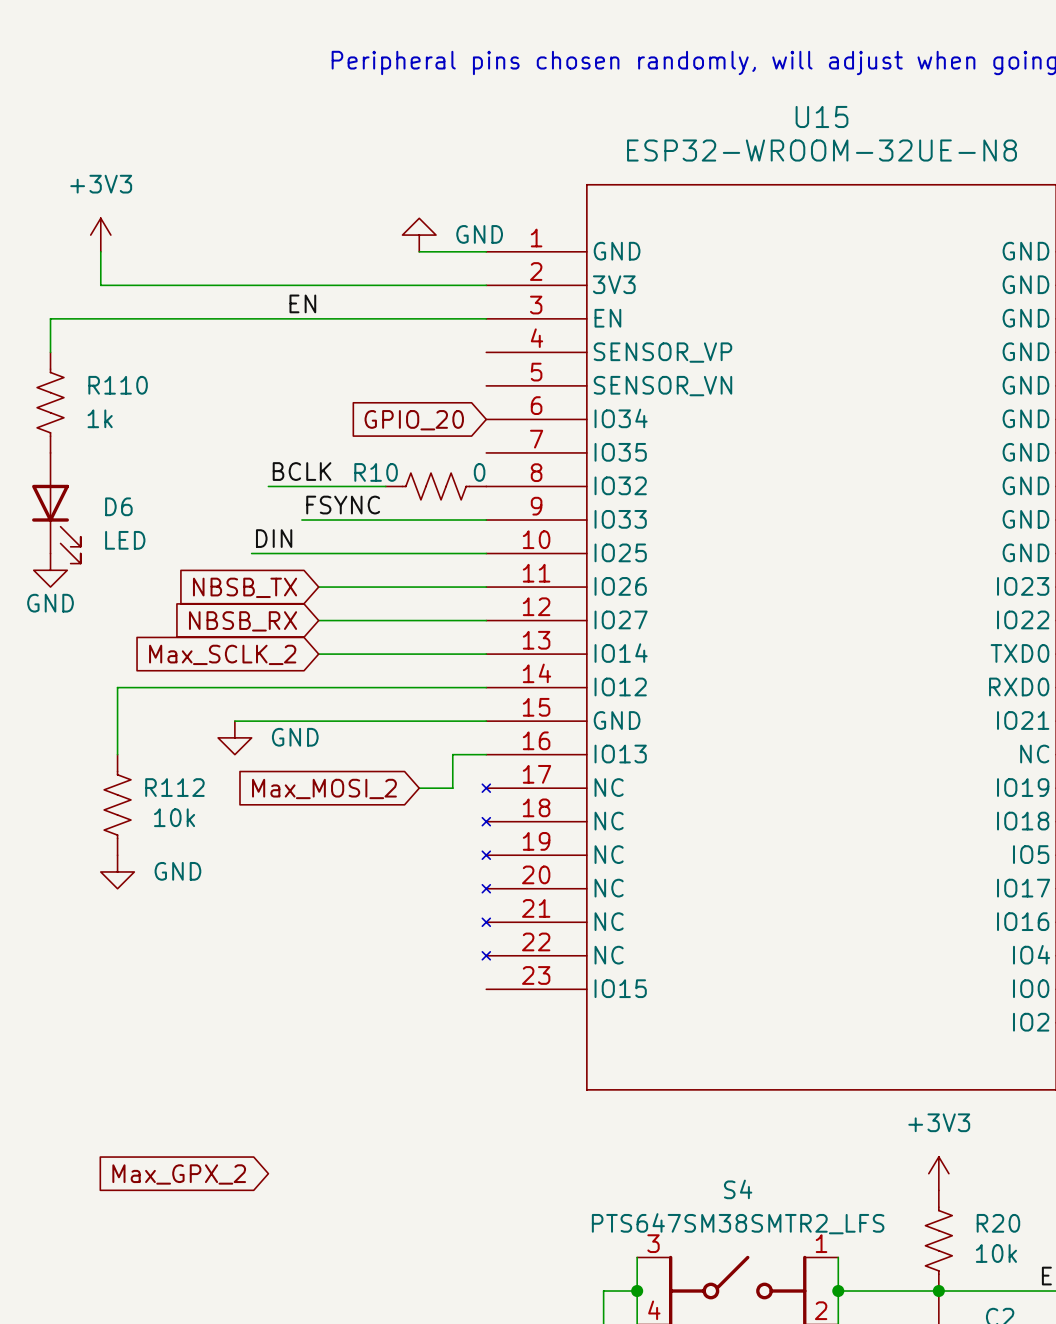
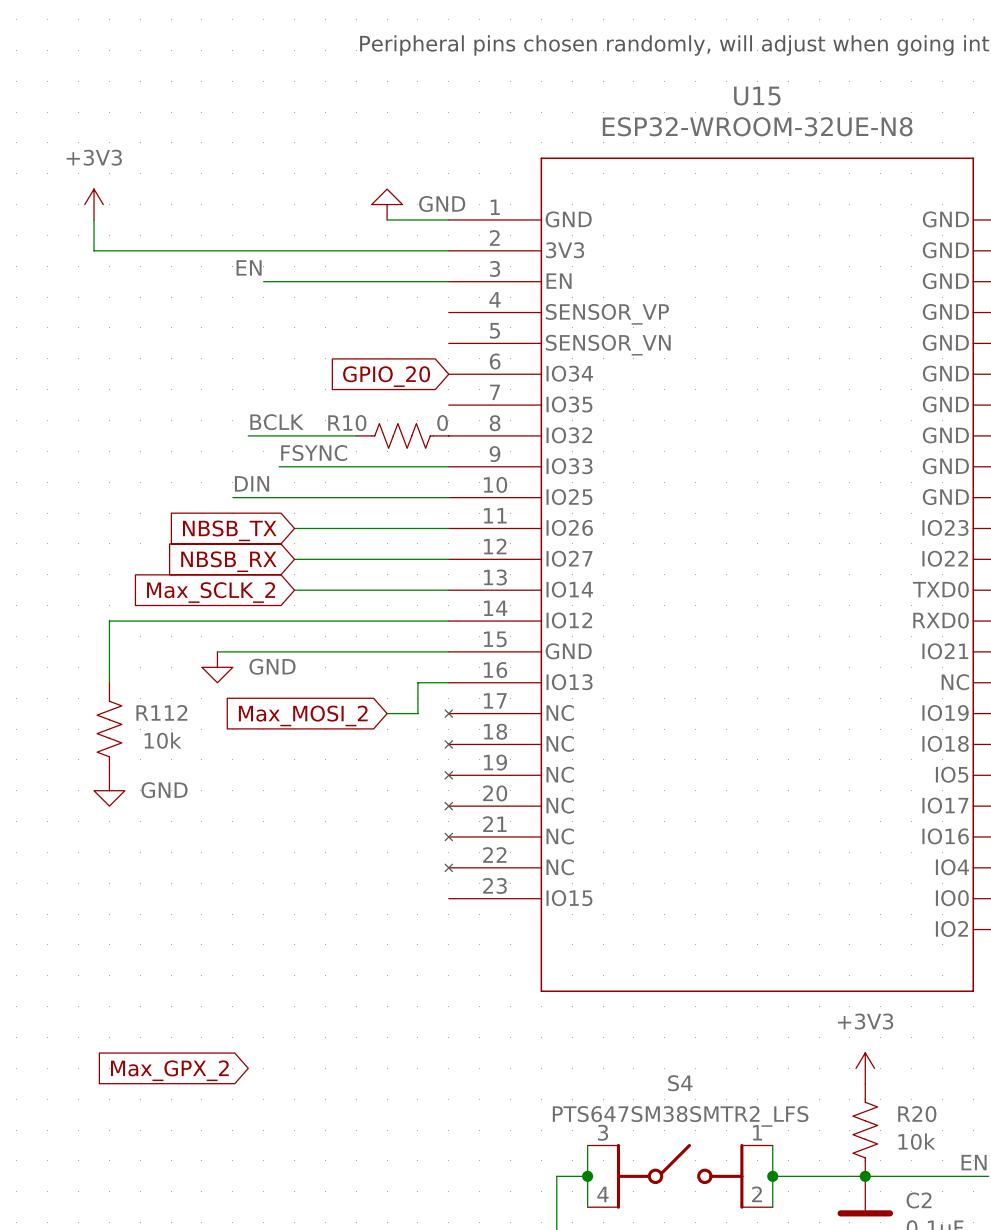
label position: EN (302, 303) -> EN (249, 267)
wire: (285, 318) (50, 318) (50, 352) -> none
R110: 1k (50, 402) -> none
D6: LED (56, 508) -> none
power symbol: GND (50, 570) -> none

